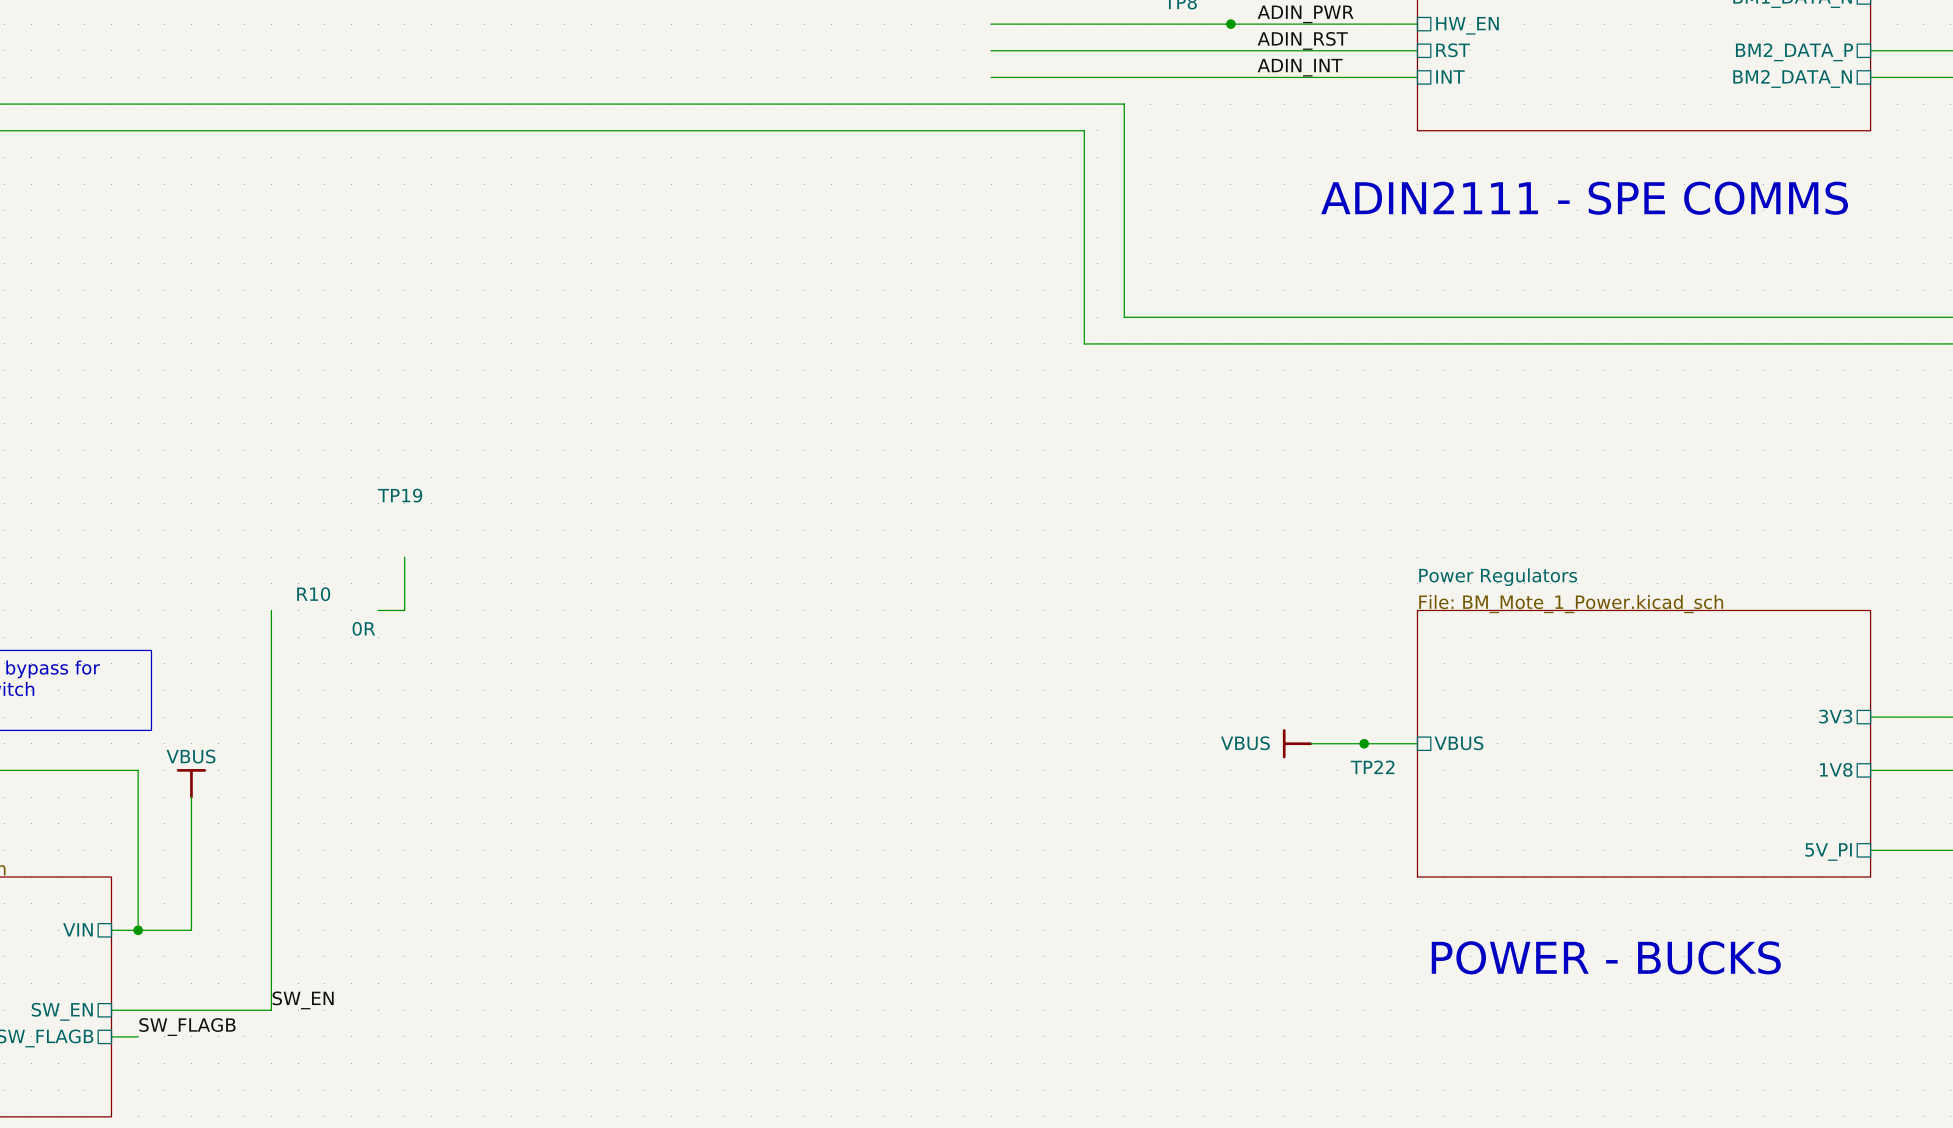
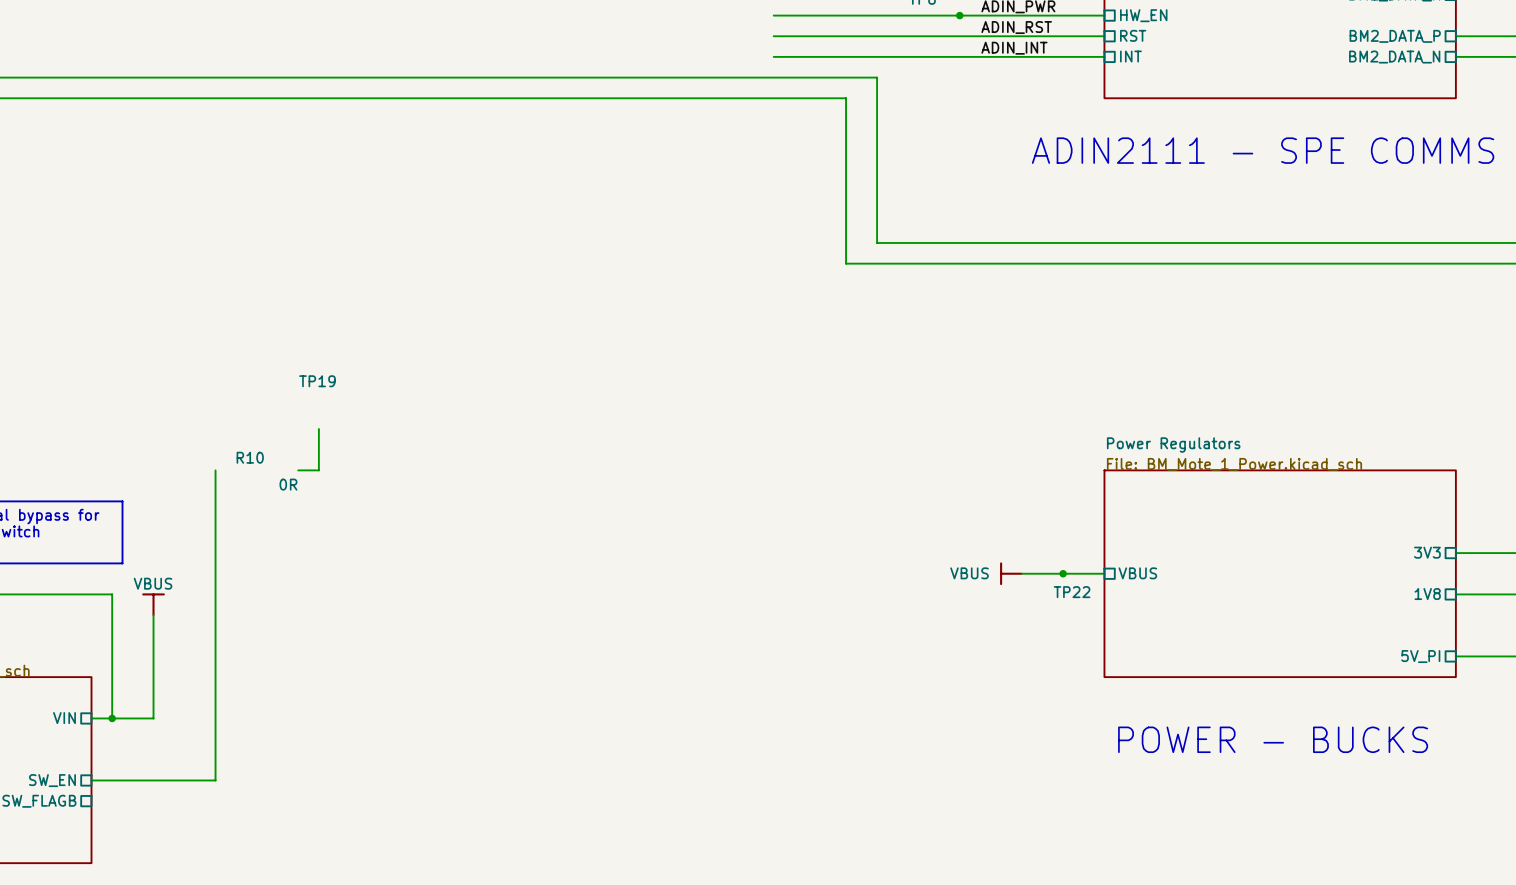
label: SW_EN (303, 1000) -> none
label: SW_FLAGB (187, 1027) -> none
wire: (111, 1036) (138, 1036) -> none

